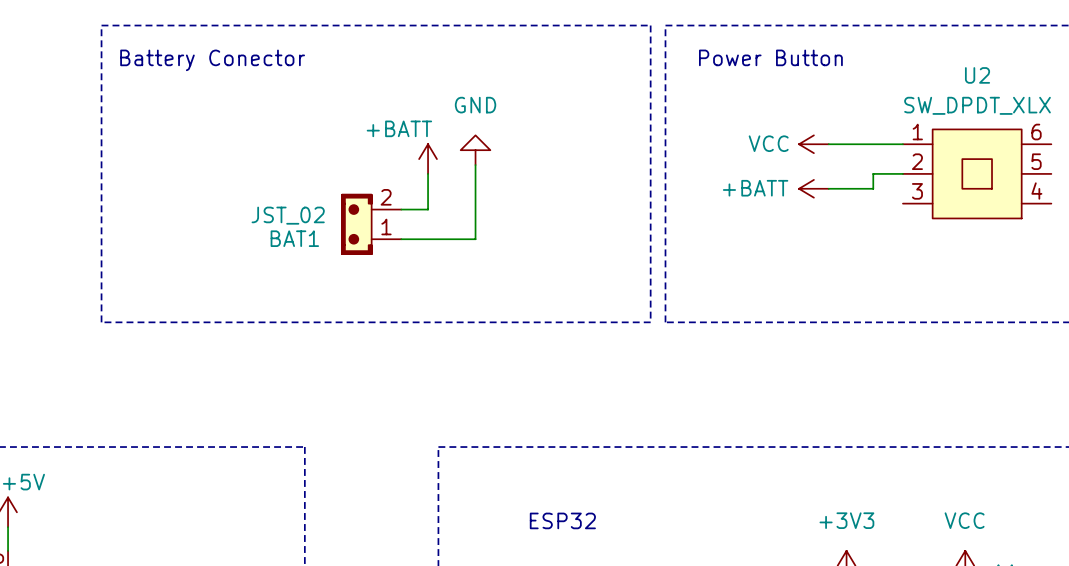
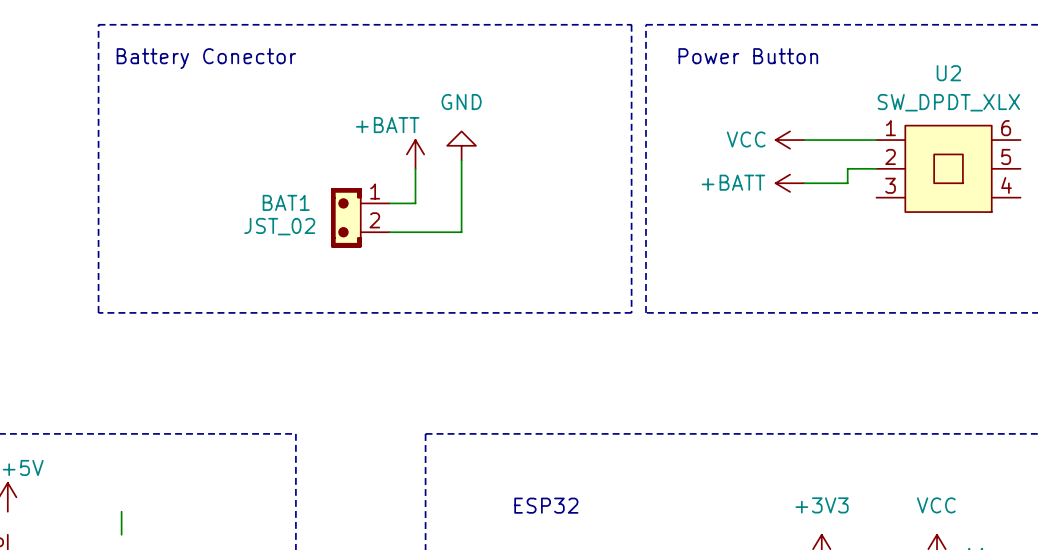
BAT1 flip: as is (356, 224) -> up-down (346, 217)
wire: (8, 527) (8, 550) -> (121, 511) (121, 534)

